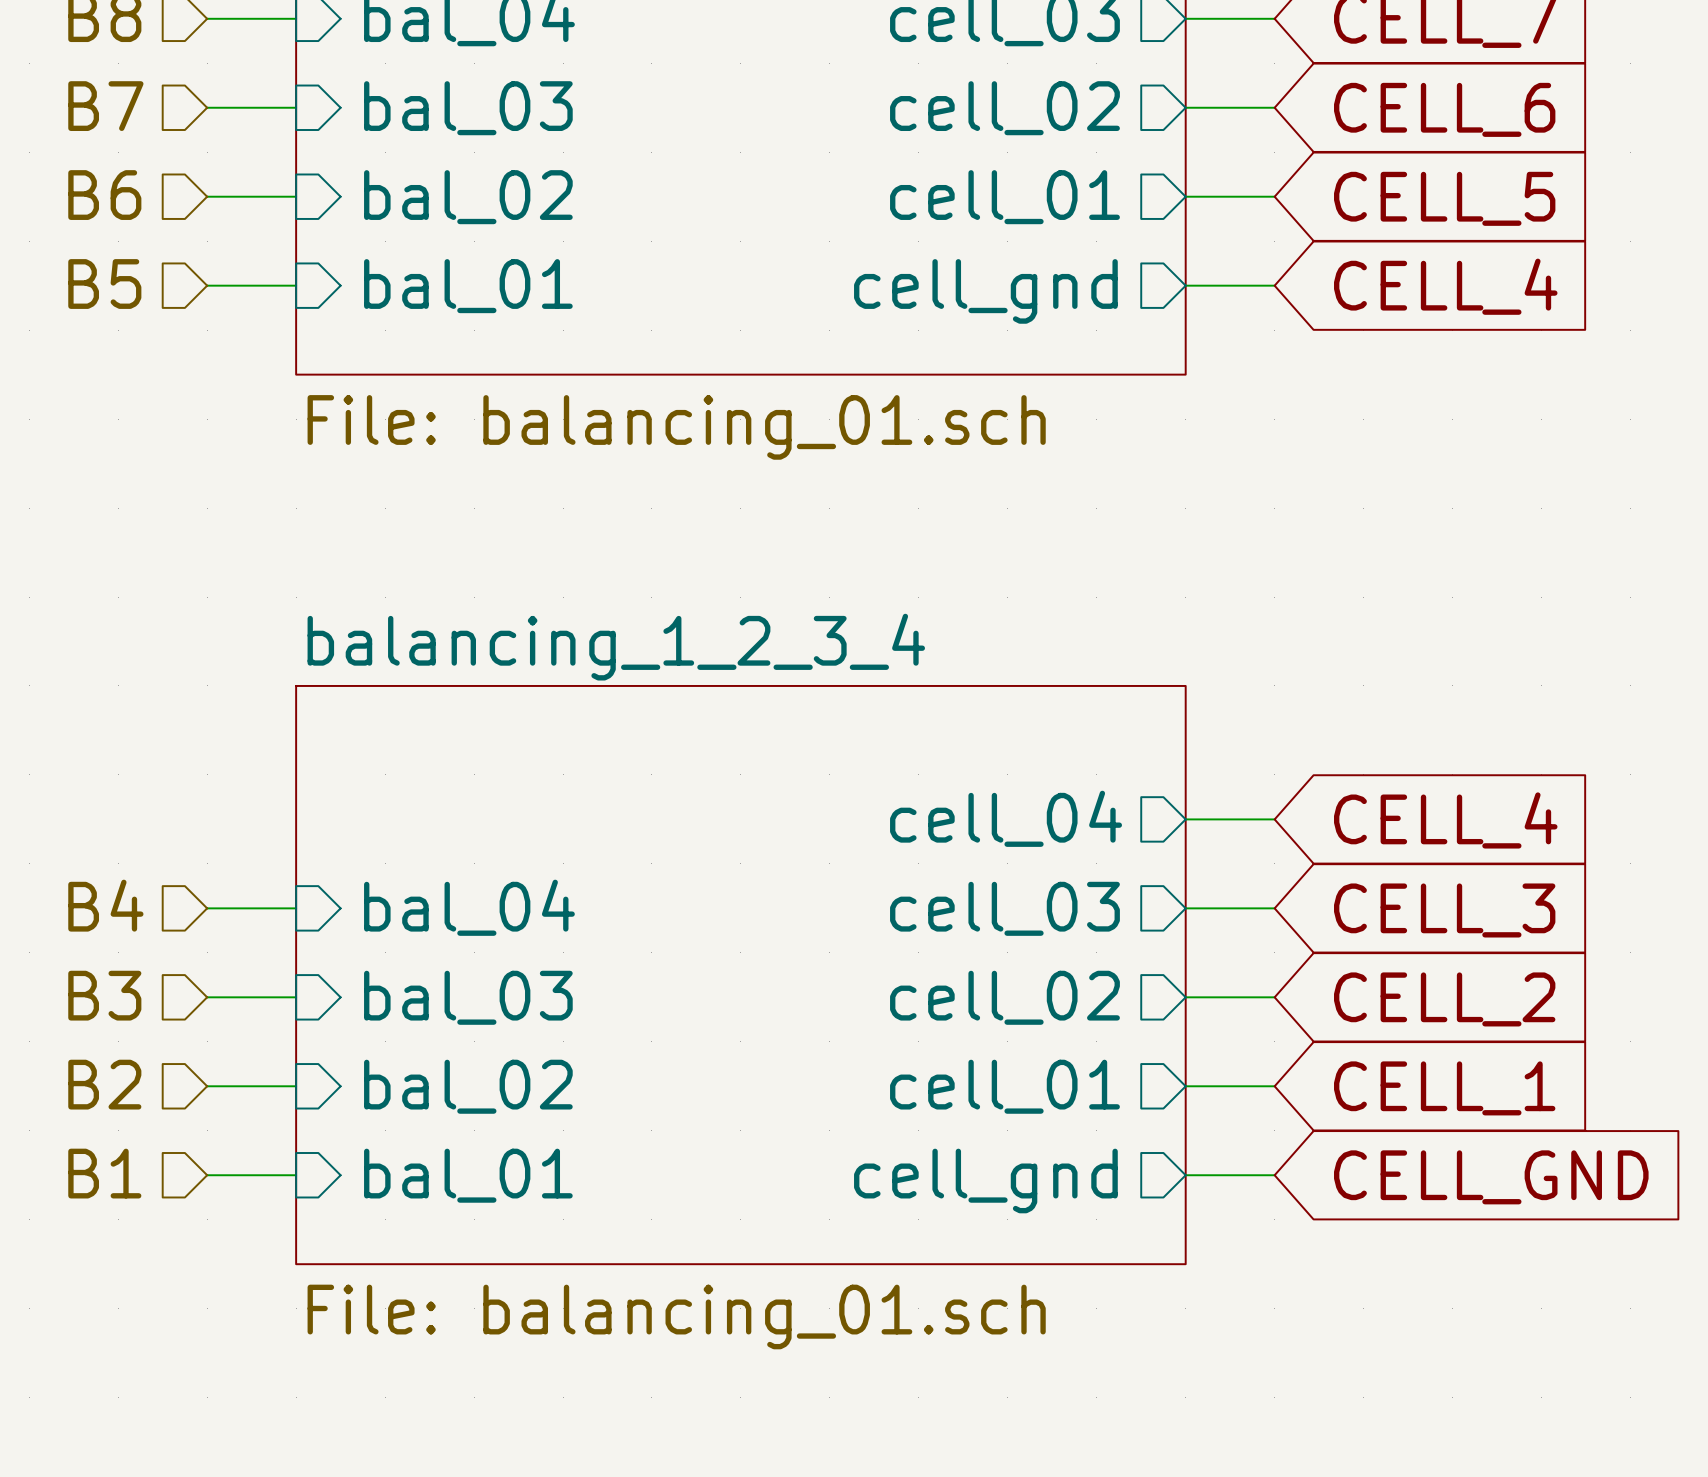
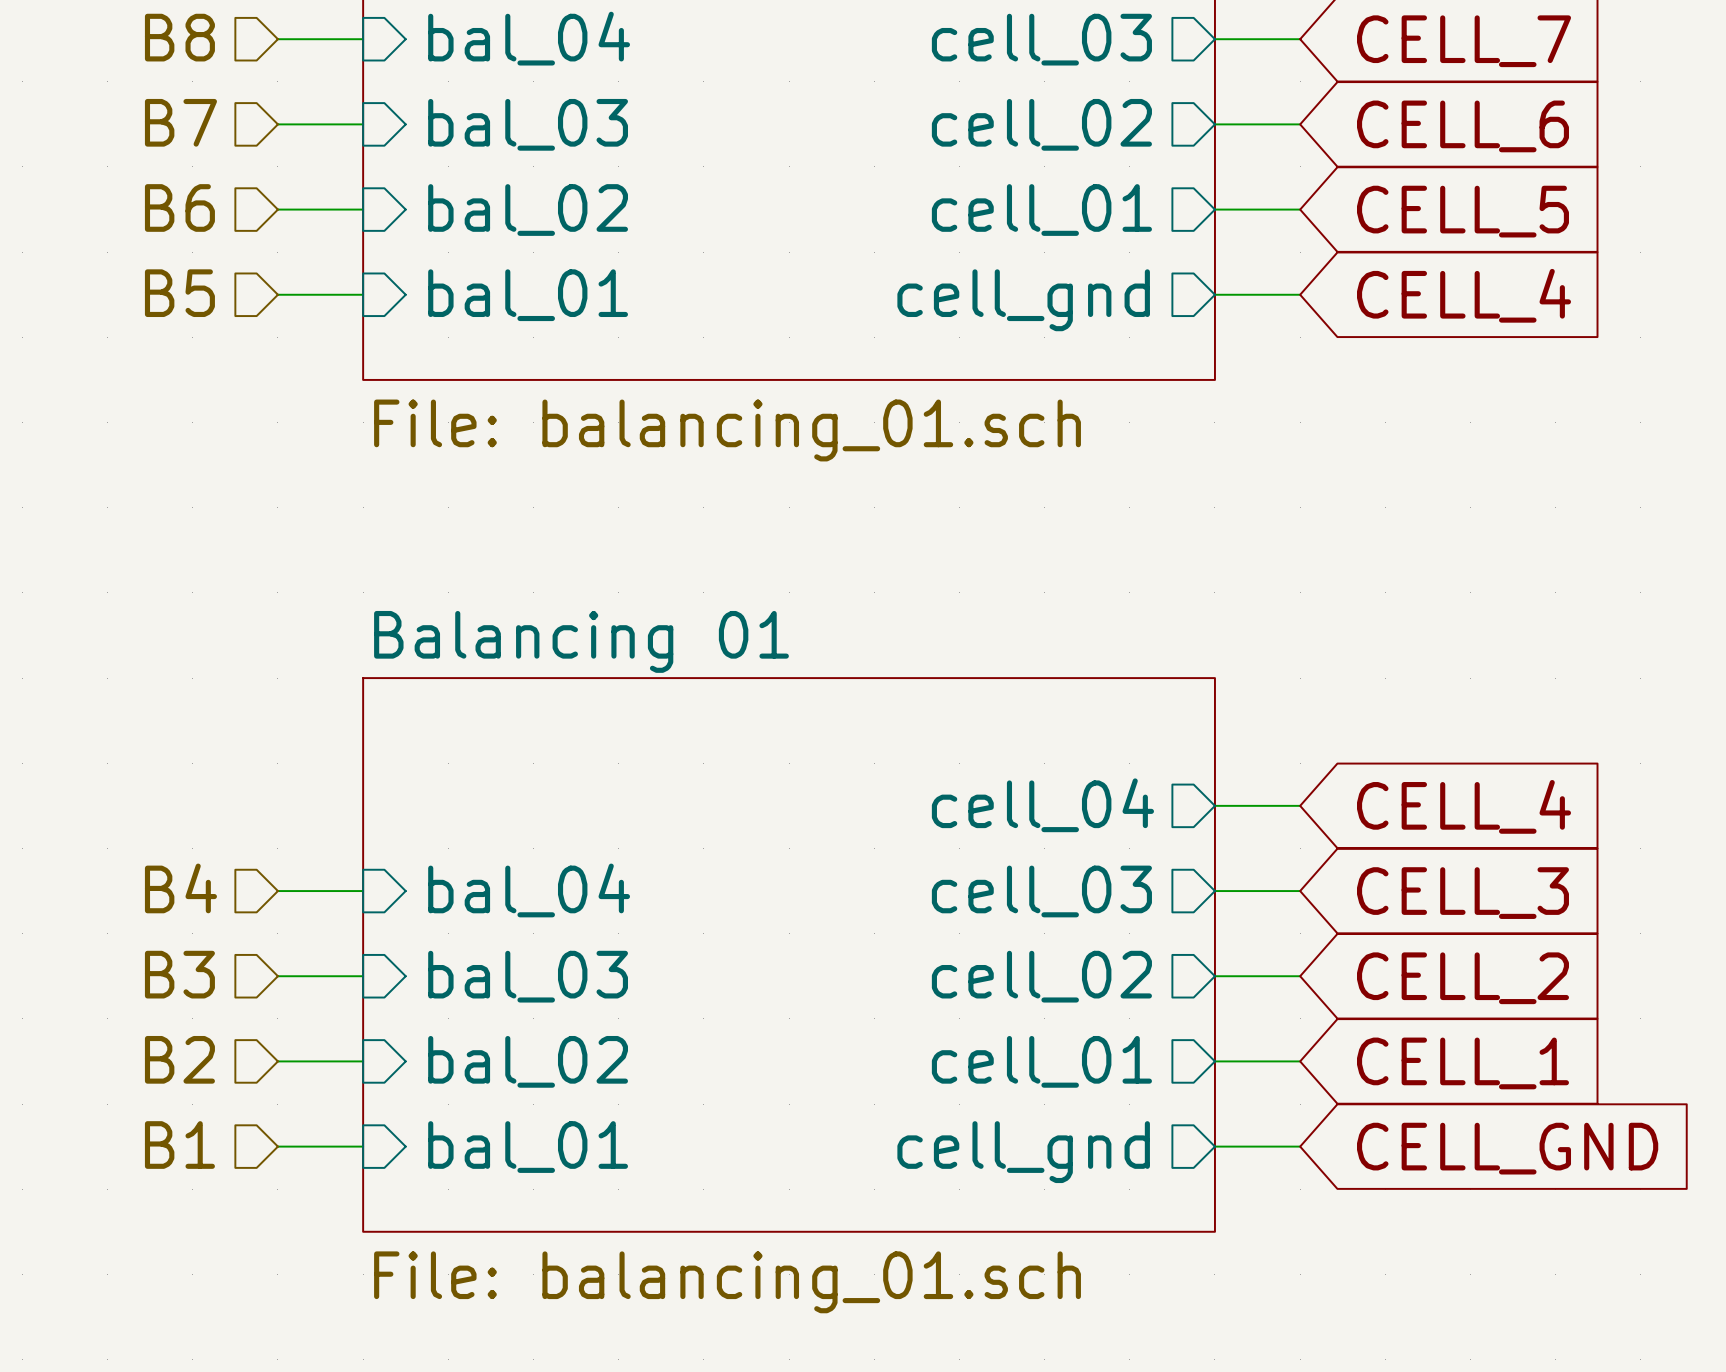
sheet balancing_1_2_3_4 name: balancing_1_2_3_4 (616, 647) -> Balancing 01 (581, 641)

